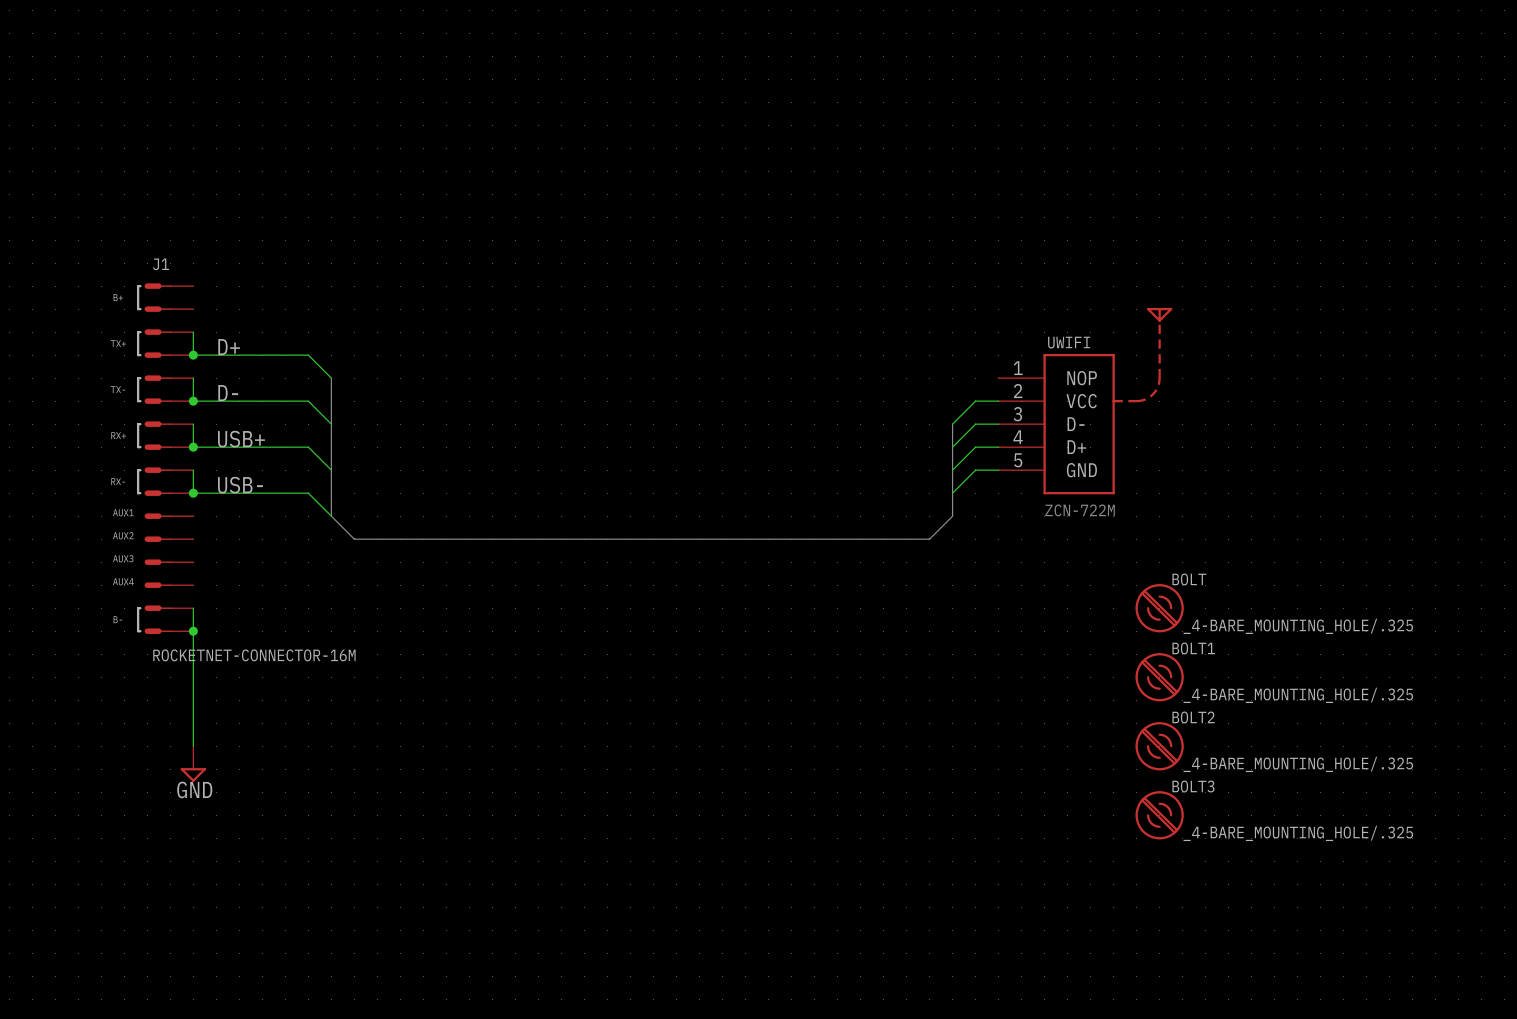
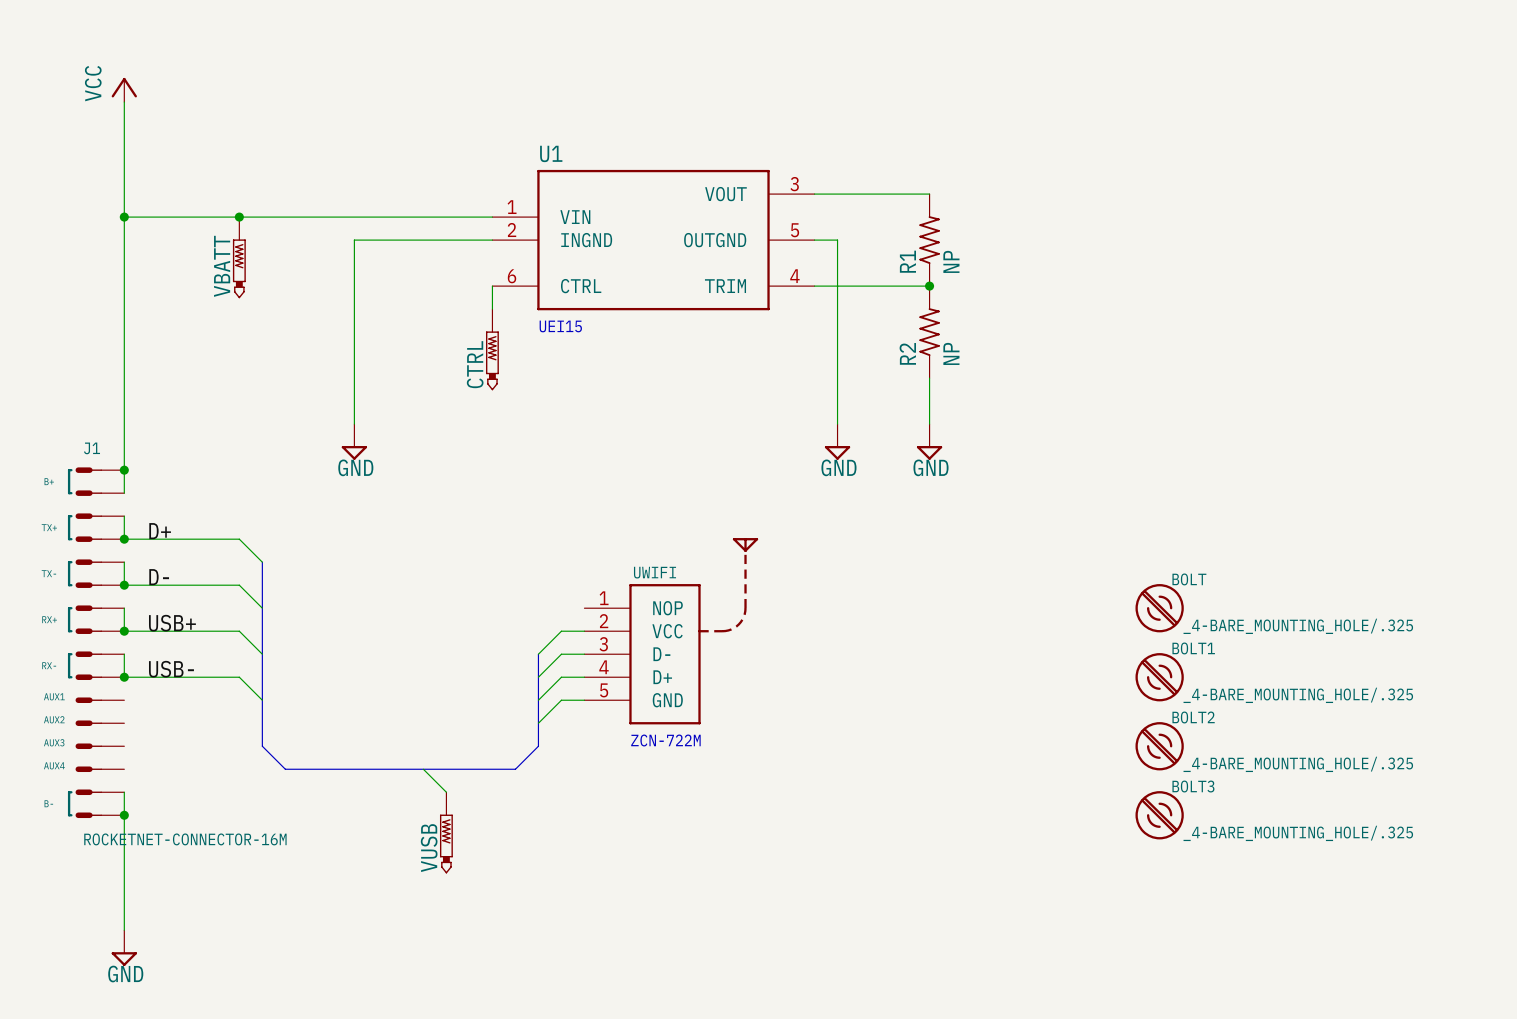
power symbol: none -> VCC (124, 89)
wire: none -> (124, 102) (124, 493)
wire: none -> (814, 194) (929, 194)
wire: none -> (124, 217) (492, 217)
junction: none -> (124, 217)
junction: none -> (239, 217)
wire: none -> (492, 240) (354, 240) (354, 424)
U1: none -> (653, 240)
wire: none -> (814, 240) (837, 240) (837, 424)
R1: none -> NP (929, 240)
VBATT: none -> (239, 257)
wire: none -> (492, 286) (492, 309)
wire: none -> (814, 286) (929, 286)
junction: none -> (929, 286)
wire: (193, 332) (193, 355) (308, 355) (331, 378) -> (124, 516) (124, 539) (239, 539) (262, 562)
R2: none -> NP (929, 332)
label position: D+ (229, 347) -> D+ (160, 531)
CTRL: none -> (492, 349)
junction: (193, 355) -> none
wire: (193, 378) (193, 401) (308, 401) (331, 424) -> (124, 562) (124, 585) (239, 585) (262, 608)
bus: (331, 378) (331, 516) (354, 539) (929, 539) (952, 516) (952, 424) -> none
wire: none -> (929, 378) (929, 424)
label position: D- (228, 393) -> D- (159, 577)
junction: (193, 401) -> none
wire: (998, 401) (975, 401) (952, 424) -> none
UWIFI: (1085, 401) -> none
wire: (193, 424) (193, 447) (308, 447) (331, 470) -> (124, 608) (124, 631) (239, 631) (262, 654)
wire: (998, 424) (975, 424) (952, 447) -> none
label position: USB+ (241, 439) -> USB+ (172, 623)
power symbol: none -> GND (354, 441)
power symbol: none -> GND (837, 441)
power symbol: none -> GND (929, 441)
junction: (193, 447) -> none
wire: (998, 447) (975, 447) (952, 470) -> none
J1 position: (165, 458) -> (96, 642)
junction: none -> (124, 470)
wire: (193, 470) (193, 493) (308, 493) (331, 516) -> (124, 654) (124, 677) (239, 677) (262, 700)
wire: (998, 470) (975, 470) (952, 493) -> none
label position: USB- (240, 485) -> USB- (171, 669)
junction: (193, 493) -> none
junction: none -> (124, 539)
bus: none -> (262, 562) (262, 746) (285, 769) (515, 769) (538, 746) (538, 654)
junction: none -> (124, 585)
wire: (193, 608) (193, 746) -> (124, 792) (124, 930)
junction: none -> (124, 631)
junction: (193, 631) -> none
wire: none -> (584, 631) (561, 631) (538, 654)
UWIFI: none -> (671, 631)
wire: none -> (584, 654) (561, 654) (538, 677)
junction: none -> (124, 677)
wire: none -> (584, 677) (561, 677) (538, 700)
wire: none -> (584, 700) (561, 700) (538, 723)
power symbol: GND (193, 764) -> none
wire: none -> (423, 769) (446, 792)
junction: none -> (124, 815)
VUSB: none -> (446, 832)
power symbol: none -> GND (124, 948)

